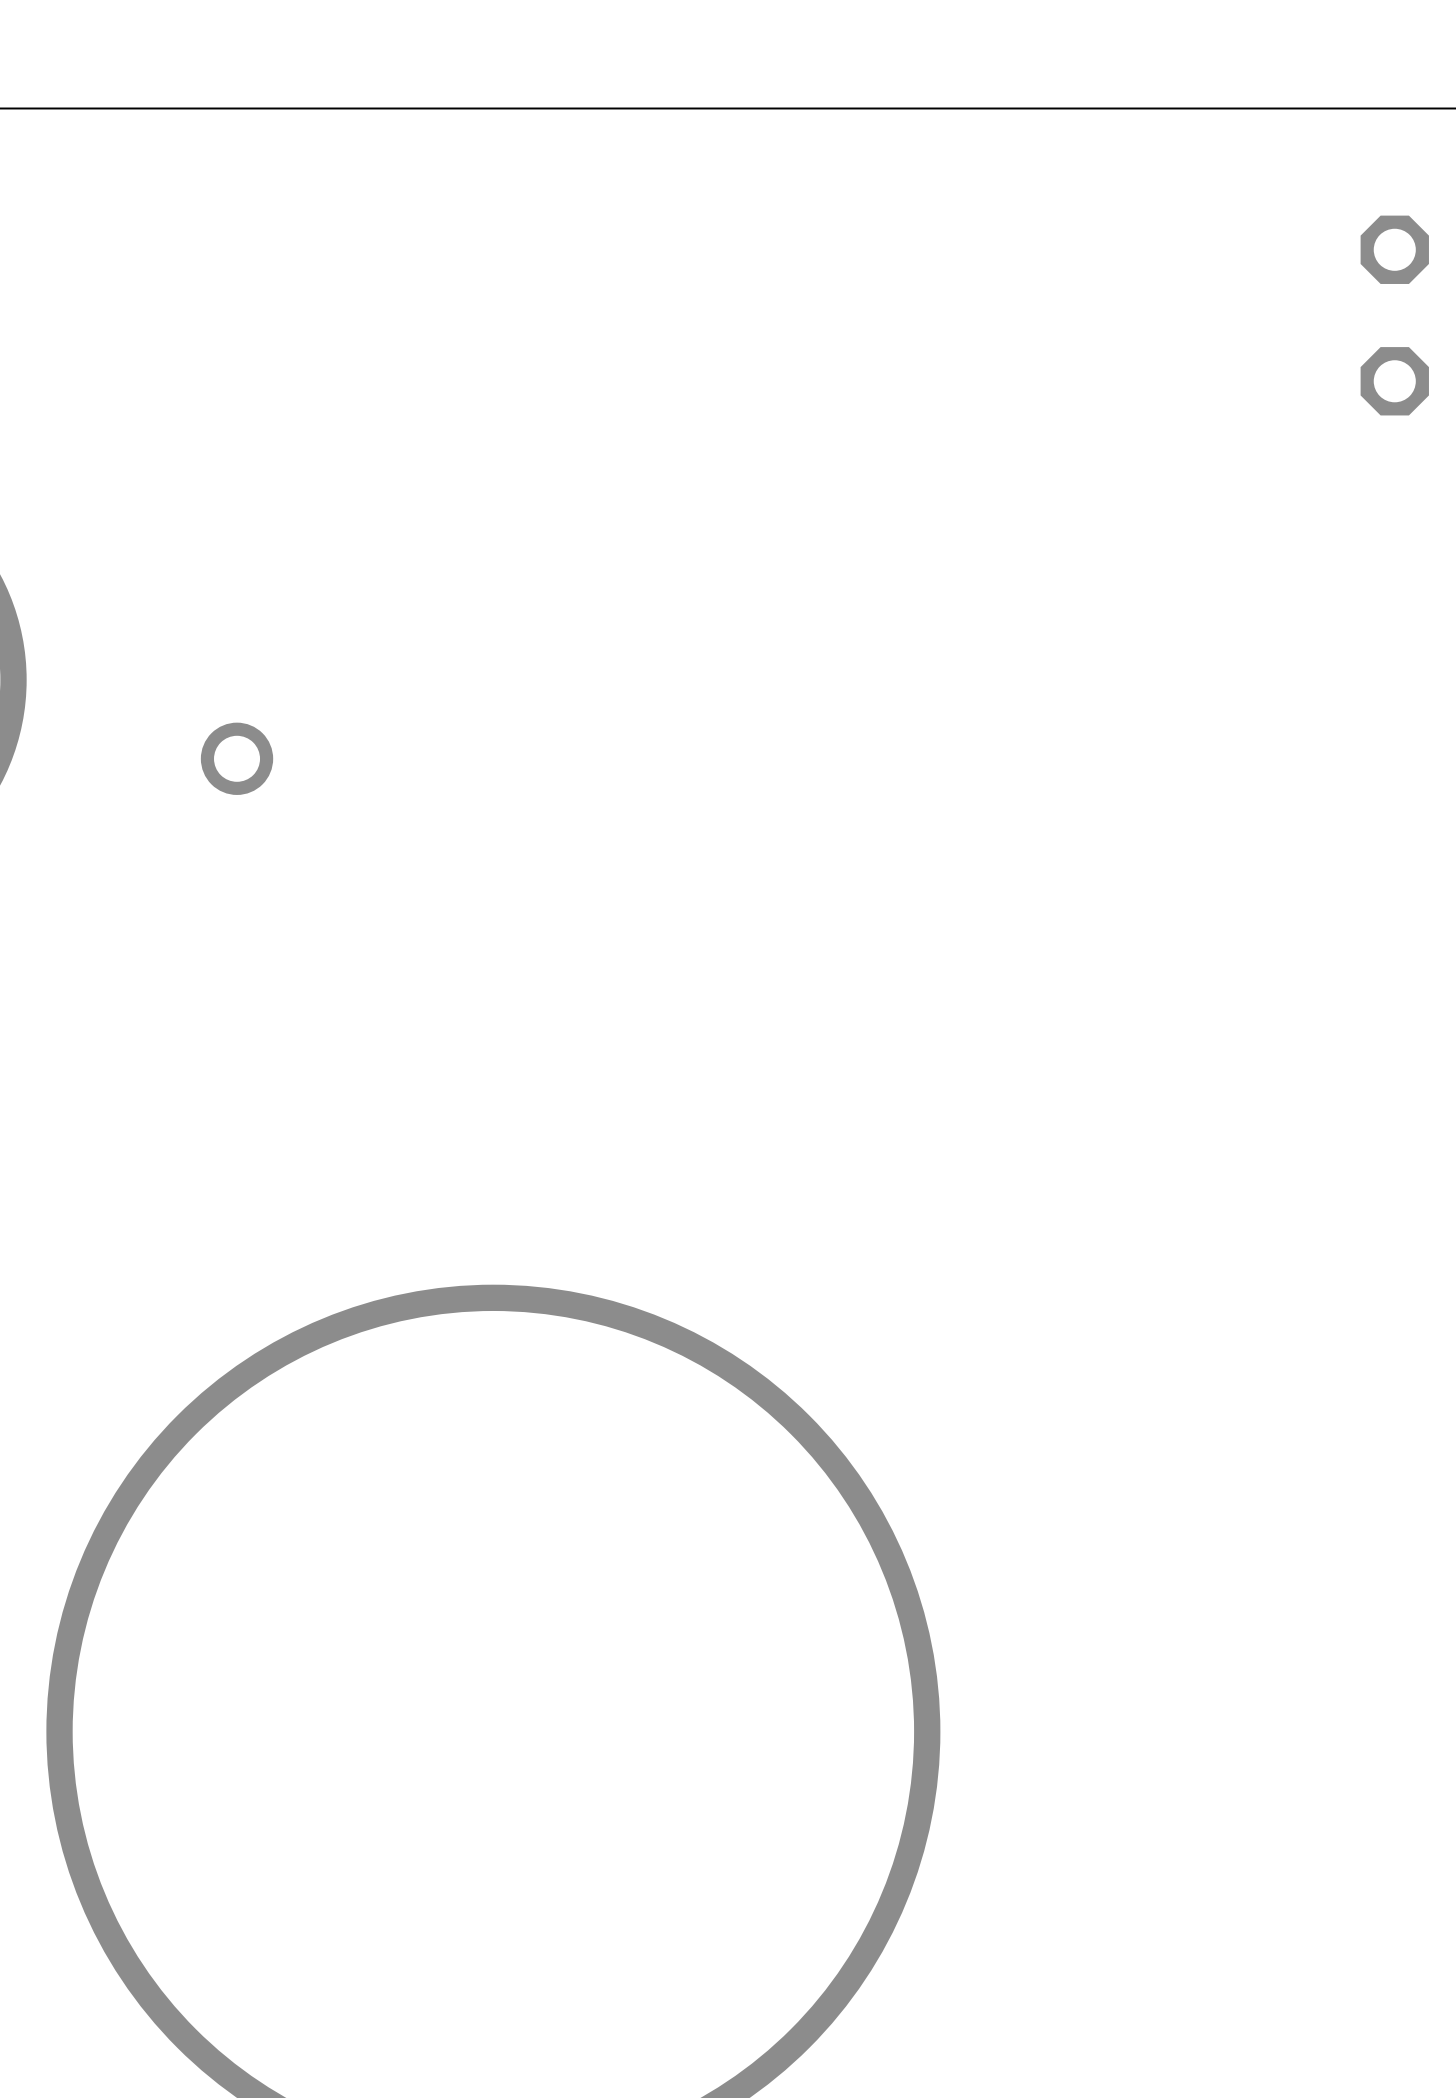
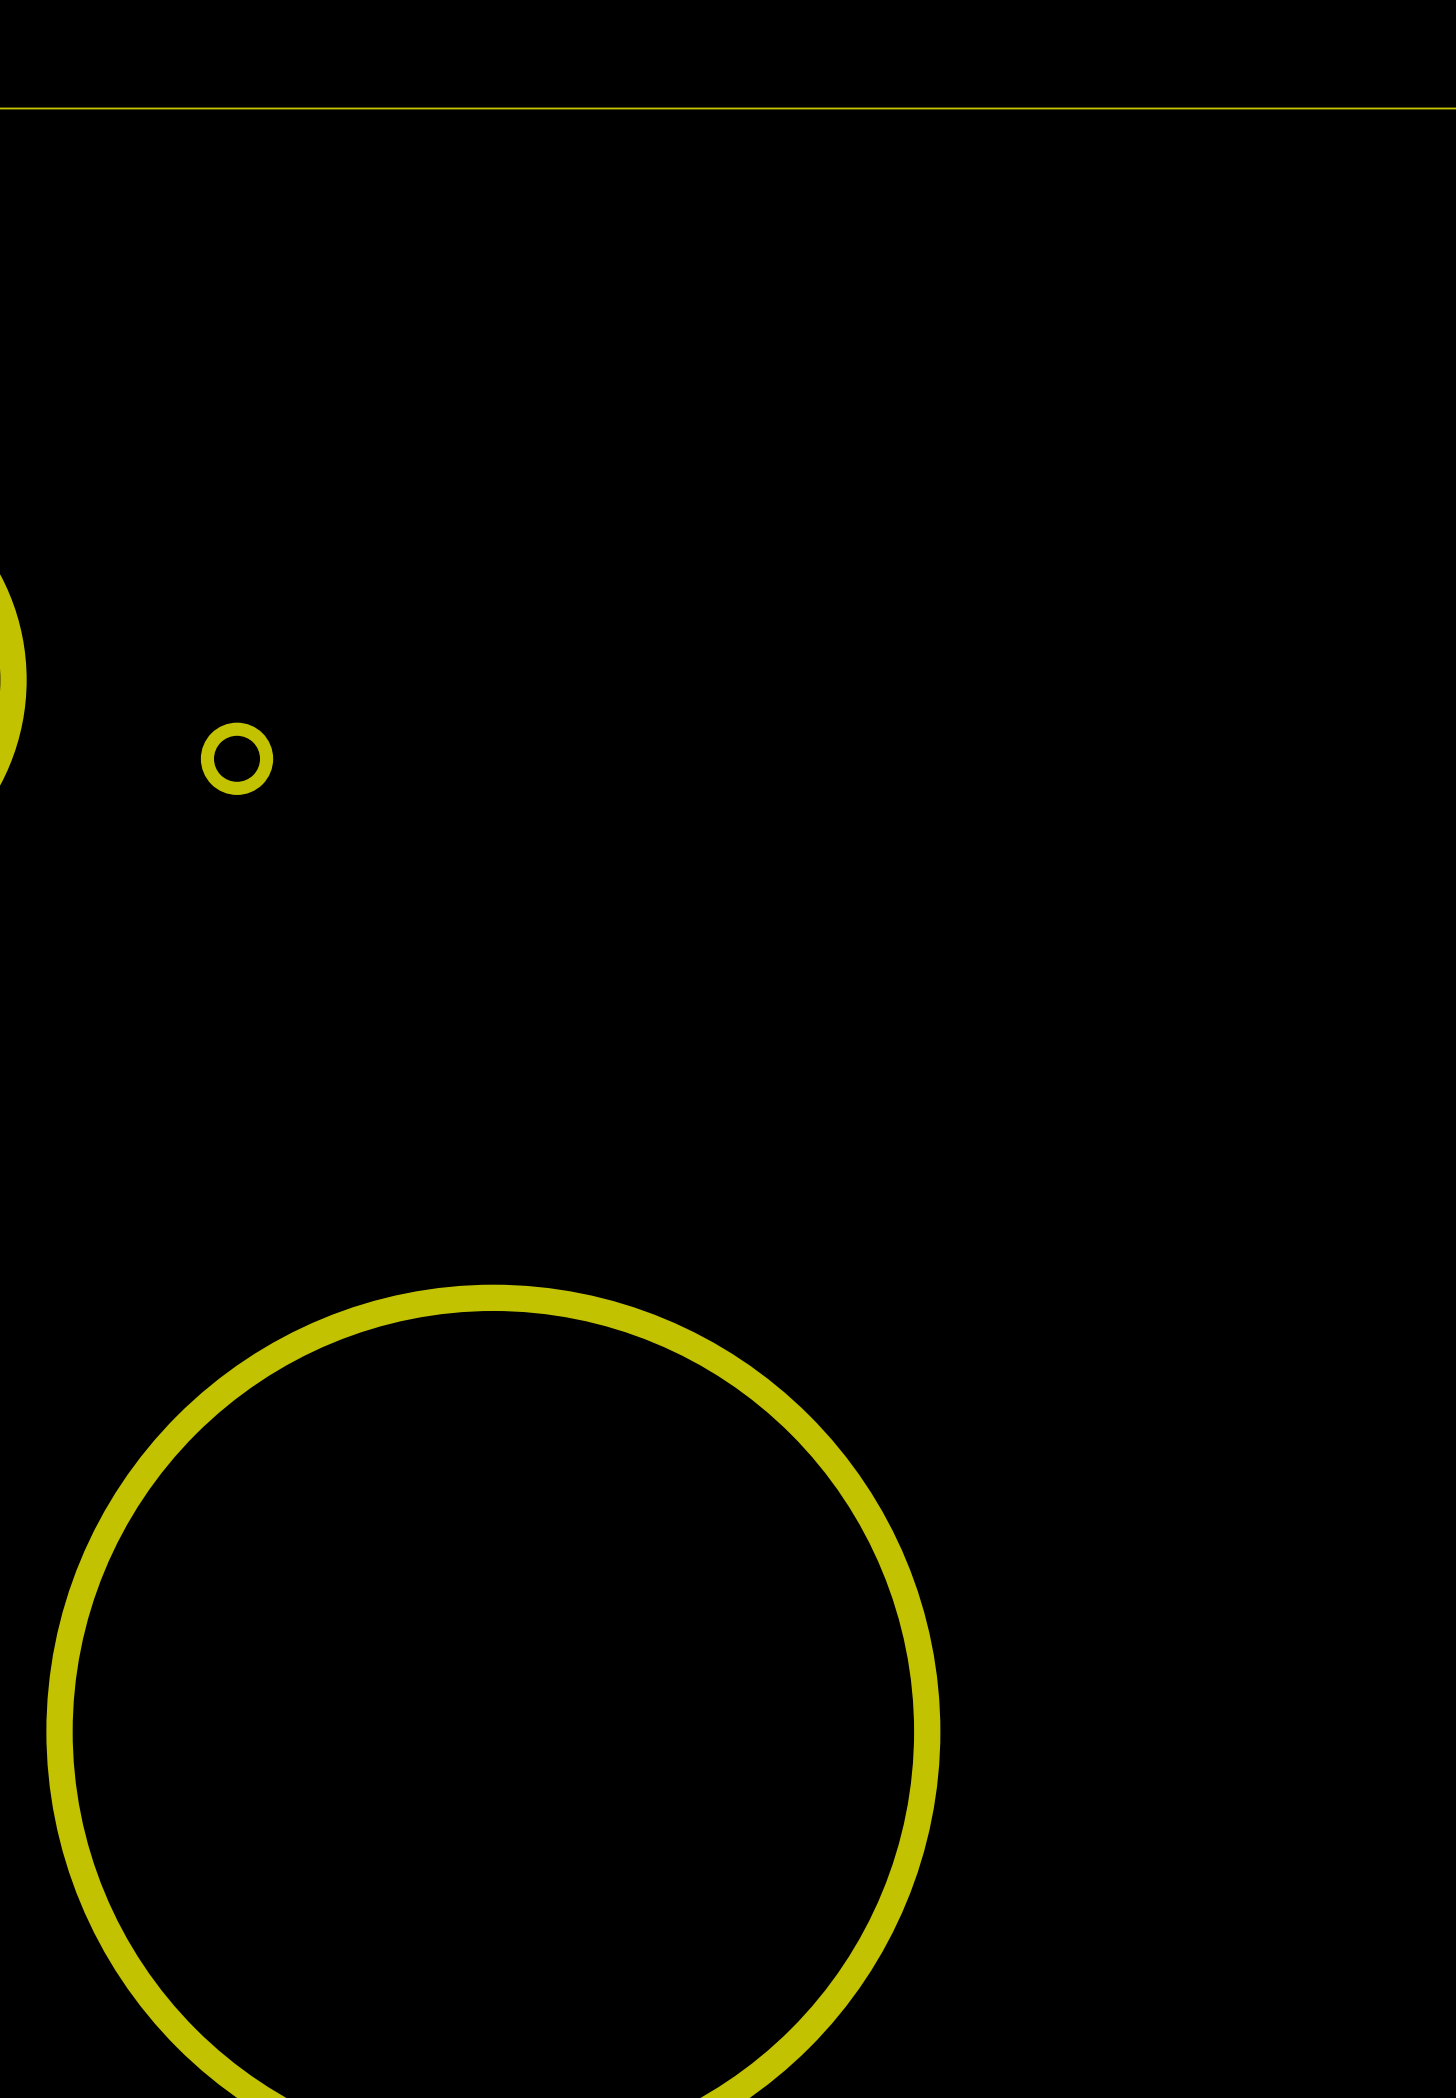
part: (1394, 315) -> none

